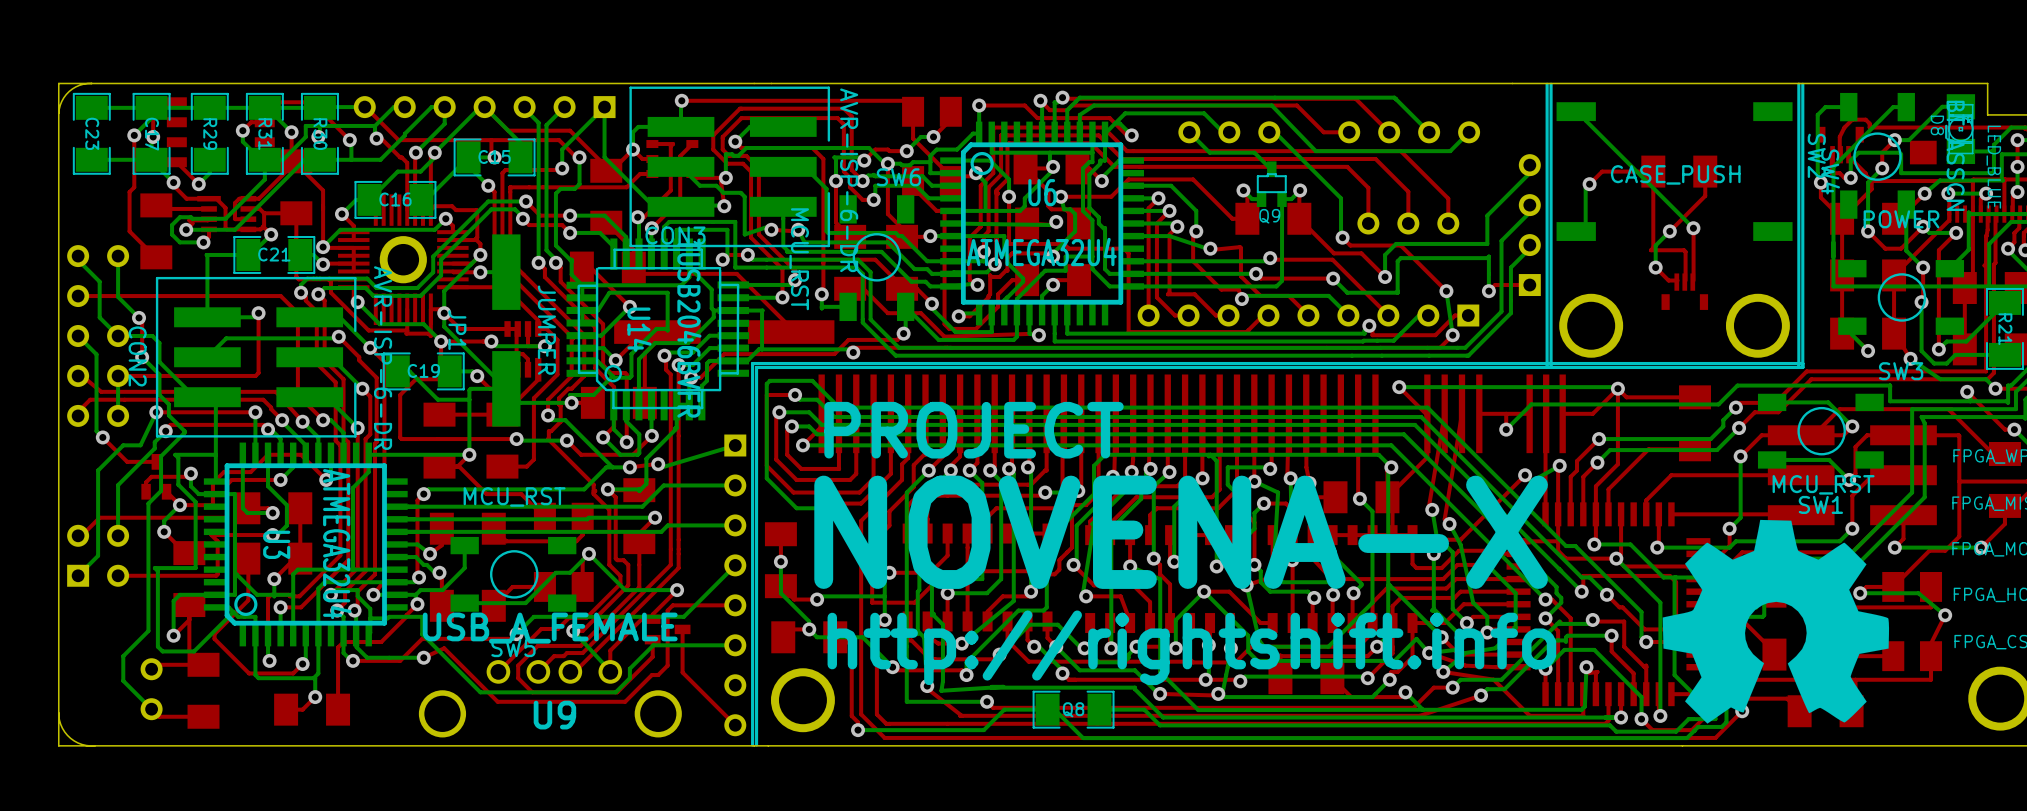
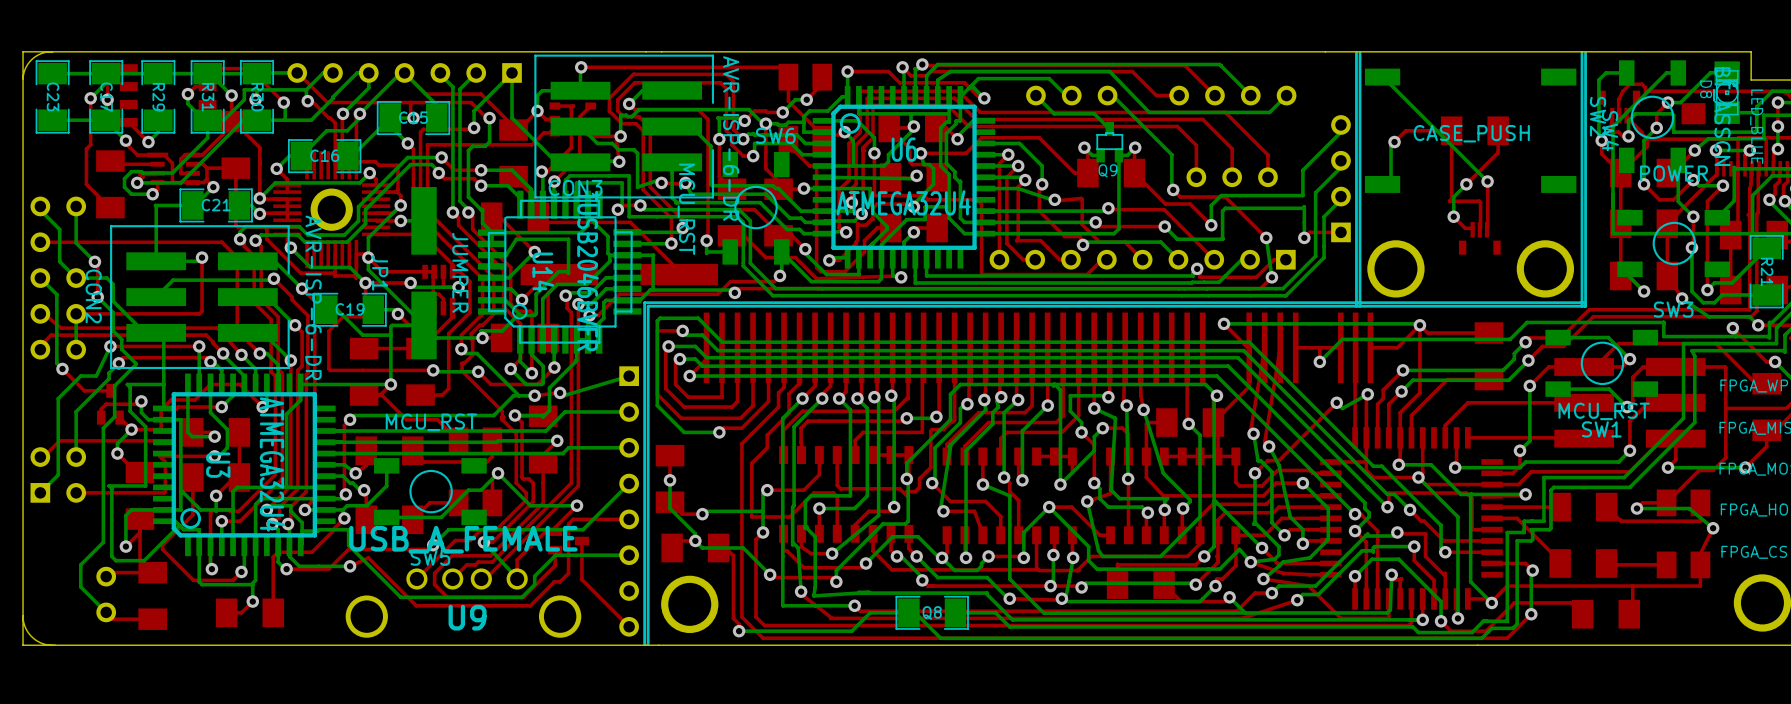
text: PROJECT (974, 430) -> none
drawing: [1662, 519, 1890, 724] -> none
text: NOVENA-X (1181, 532) -> none
text: http://rightshift.info (1191, 647) -> none

